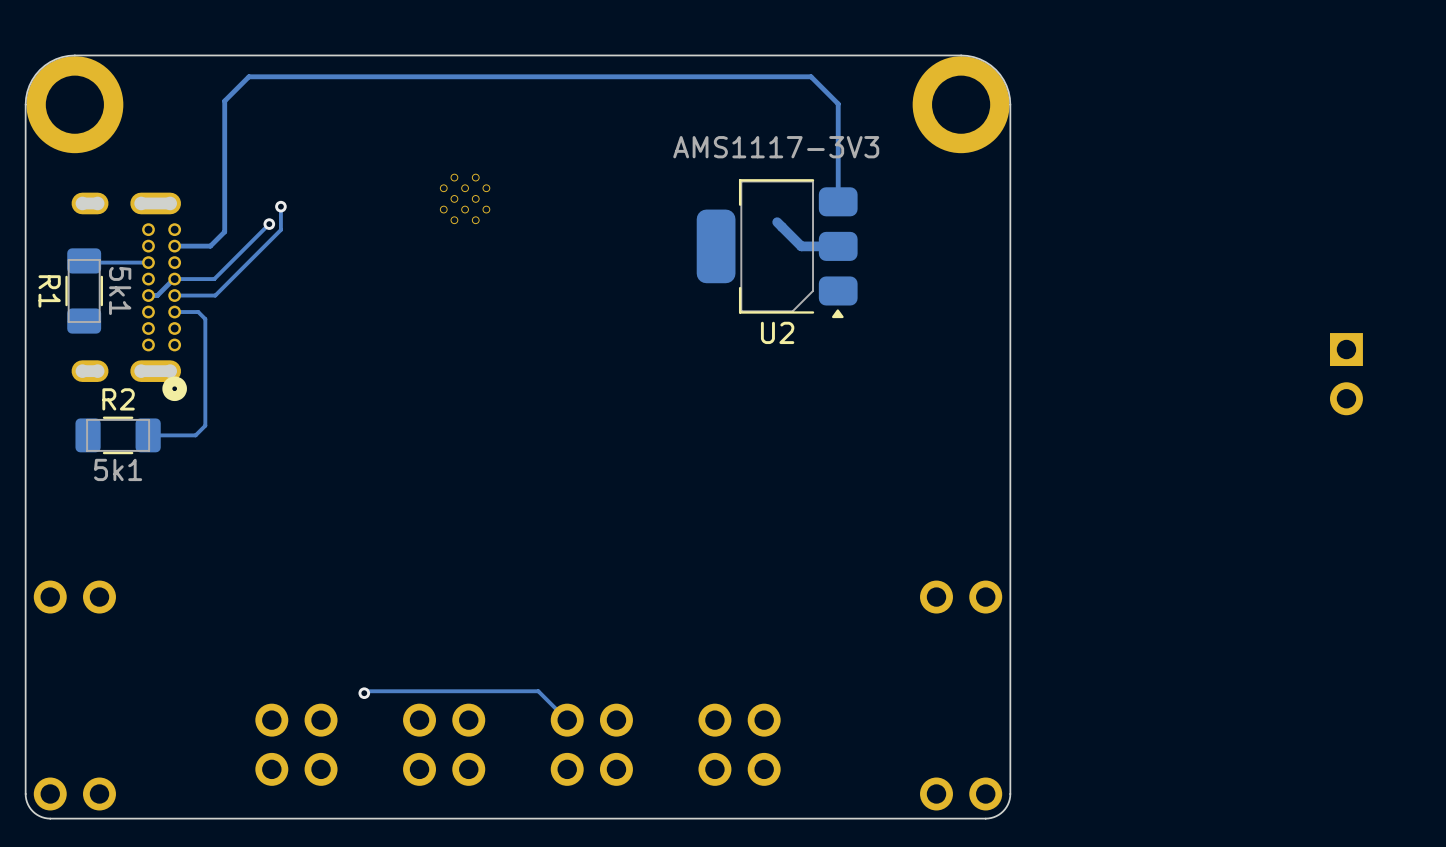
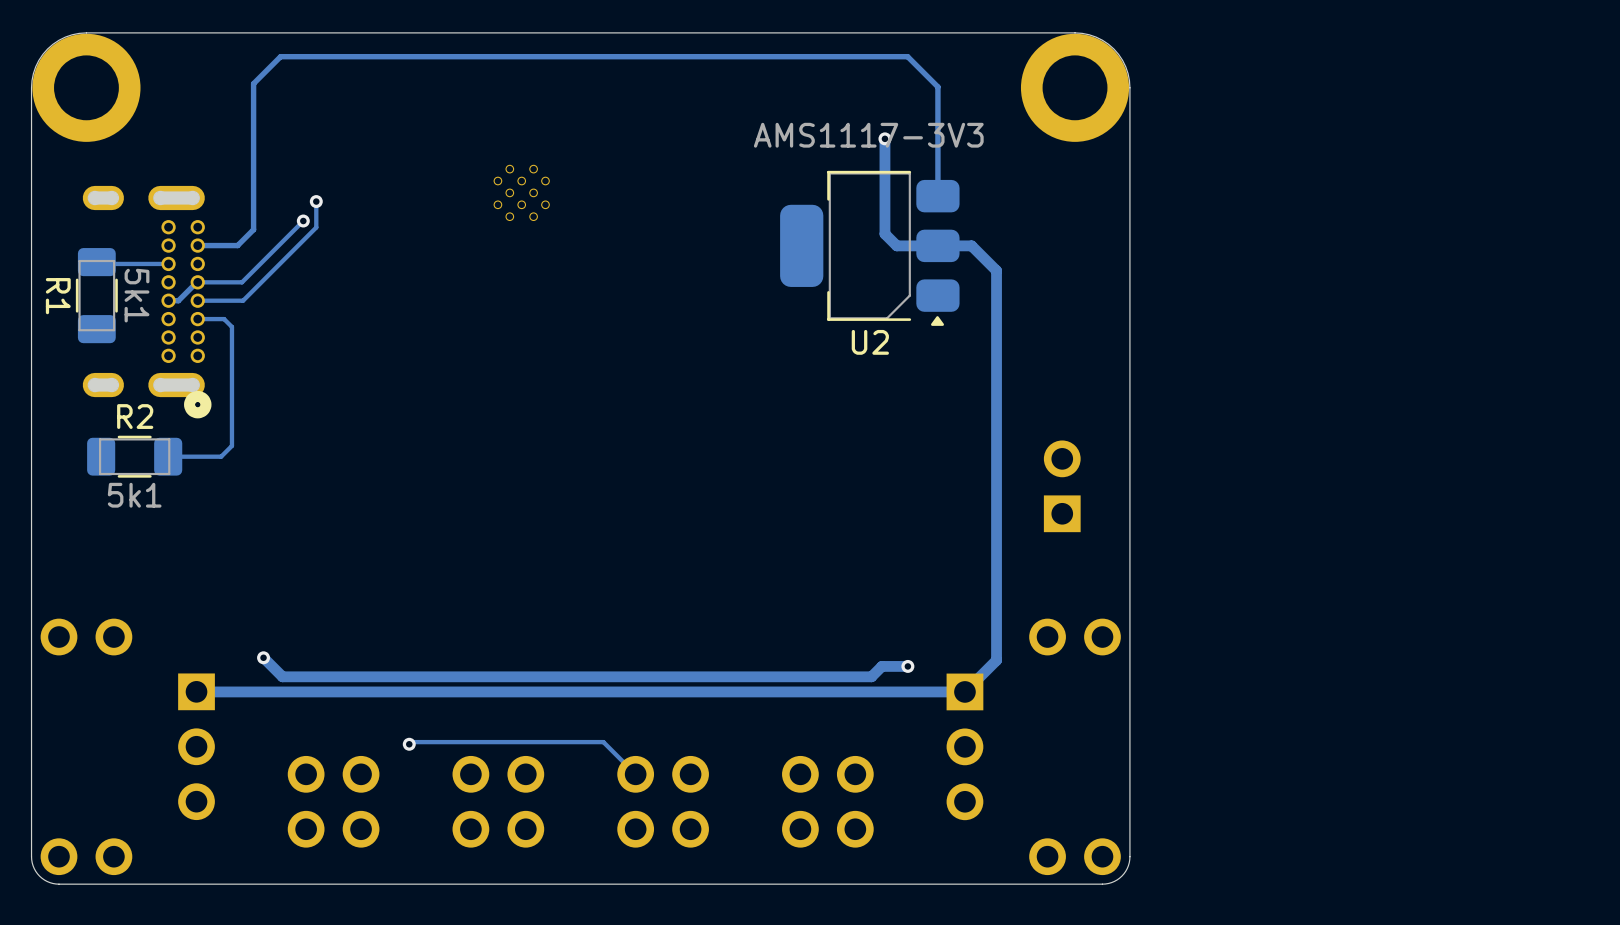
via: none -> (884, 138)
track: (777, 222) (790, 235) -> (884, 138) (884, 233)
track: none -> (937, 245) (971, 245) (996, 270) (996, 660) (964, 691) (196, 691)
part rotation: 0° (1346, 374) -> 180° (1062, 486)
part position: (1346, 374) -> (1062, 486)
track: none -> (263, 657) (282, 676) (871, 676) (881, 666) (907, 666)
via: none -> (263, 657)
via: none -> (907, 666)
part: none -> (196, 746)
part: none -> (964, 746)

